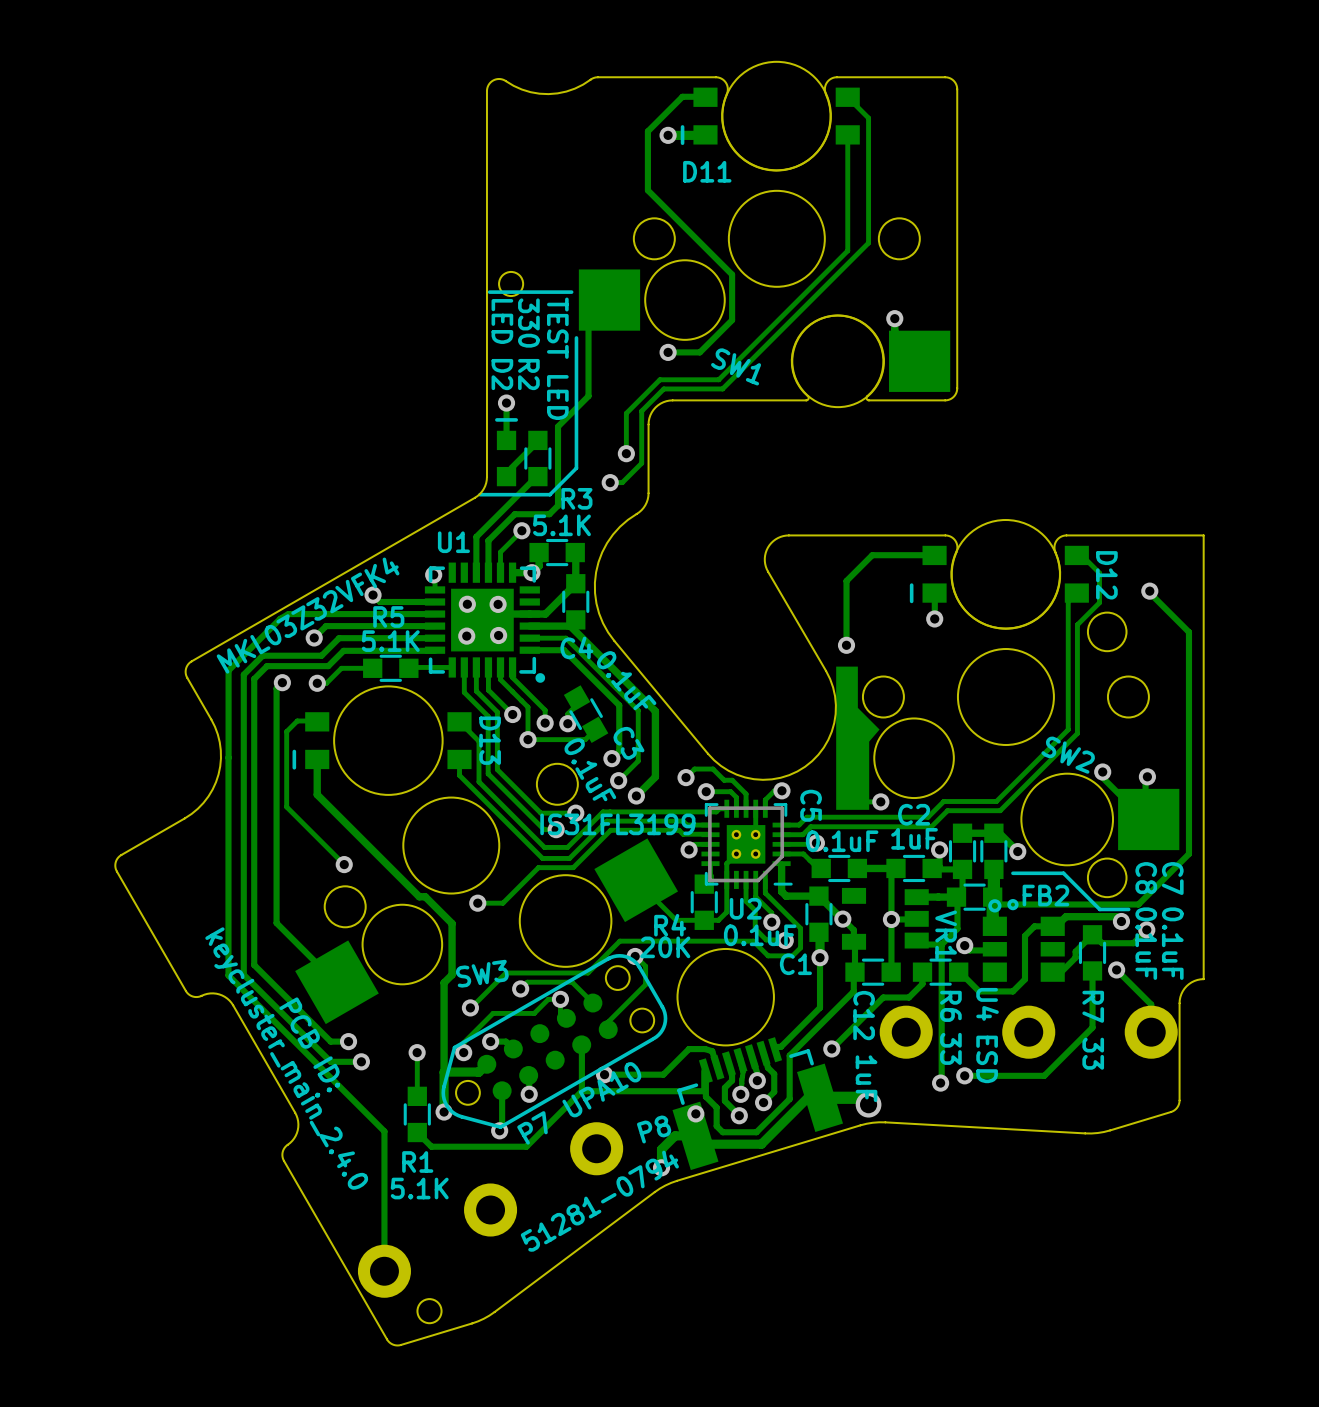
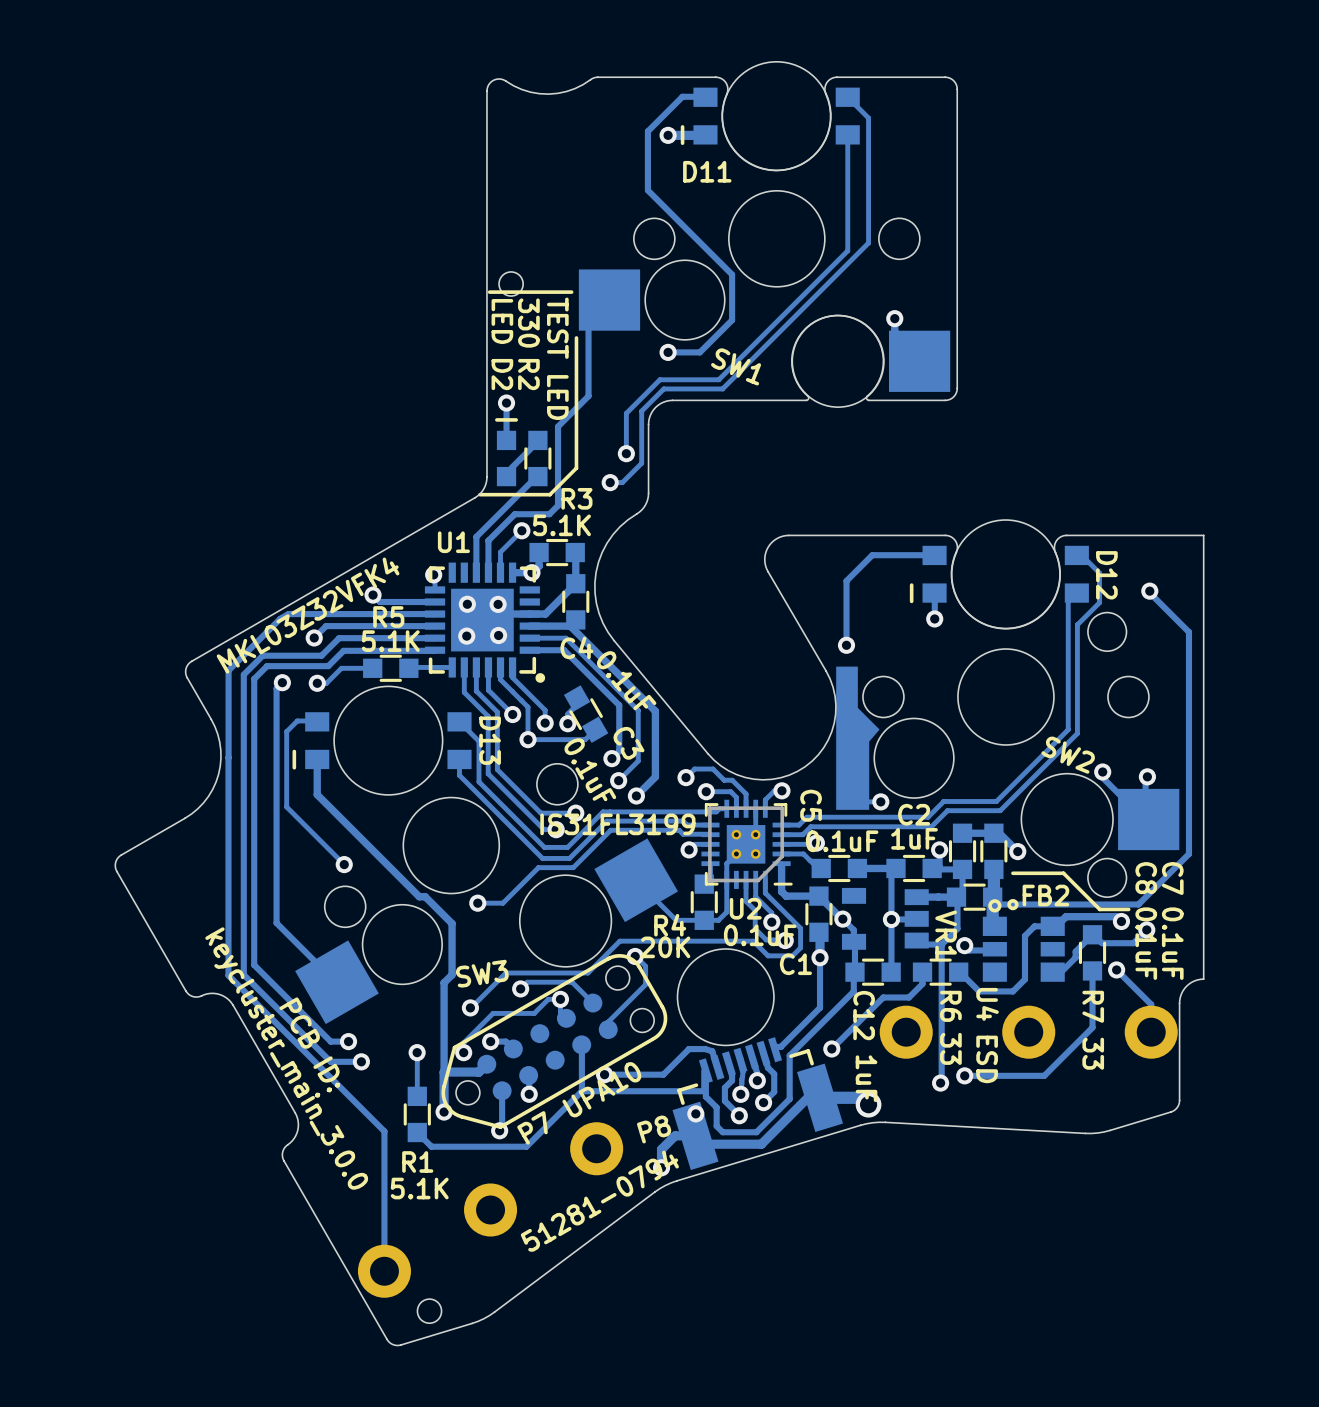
text: keycluster_main_2.4.0 (286, 1058) -> keycluster_main_3.0.0 (286, 1058)

